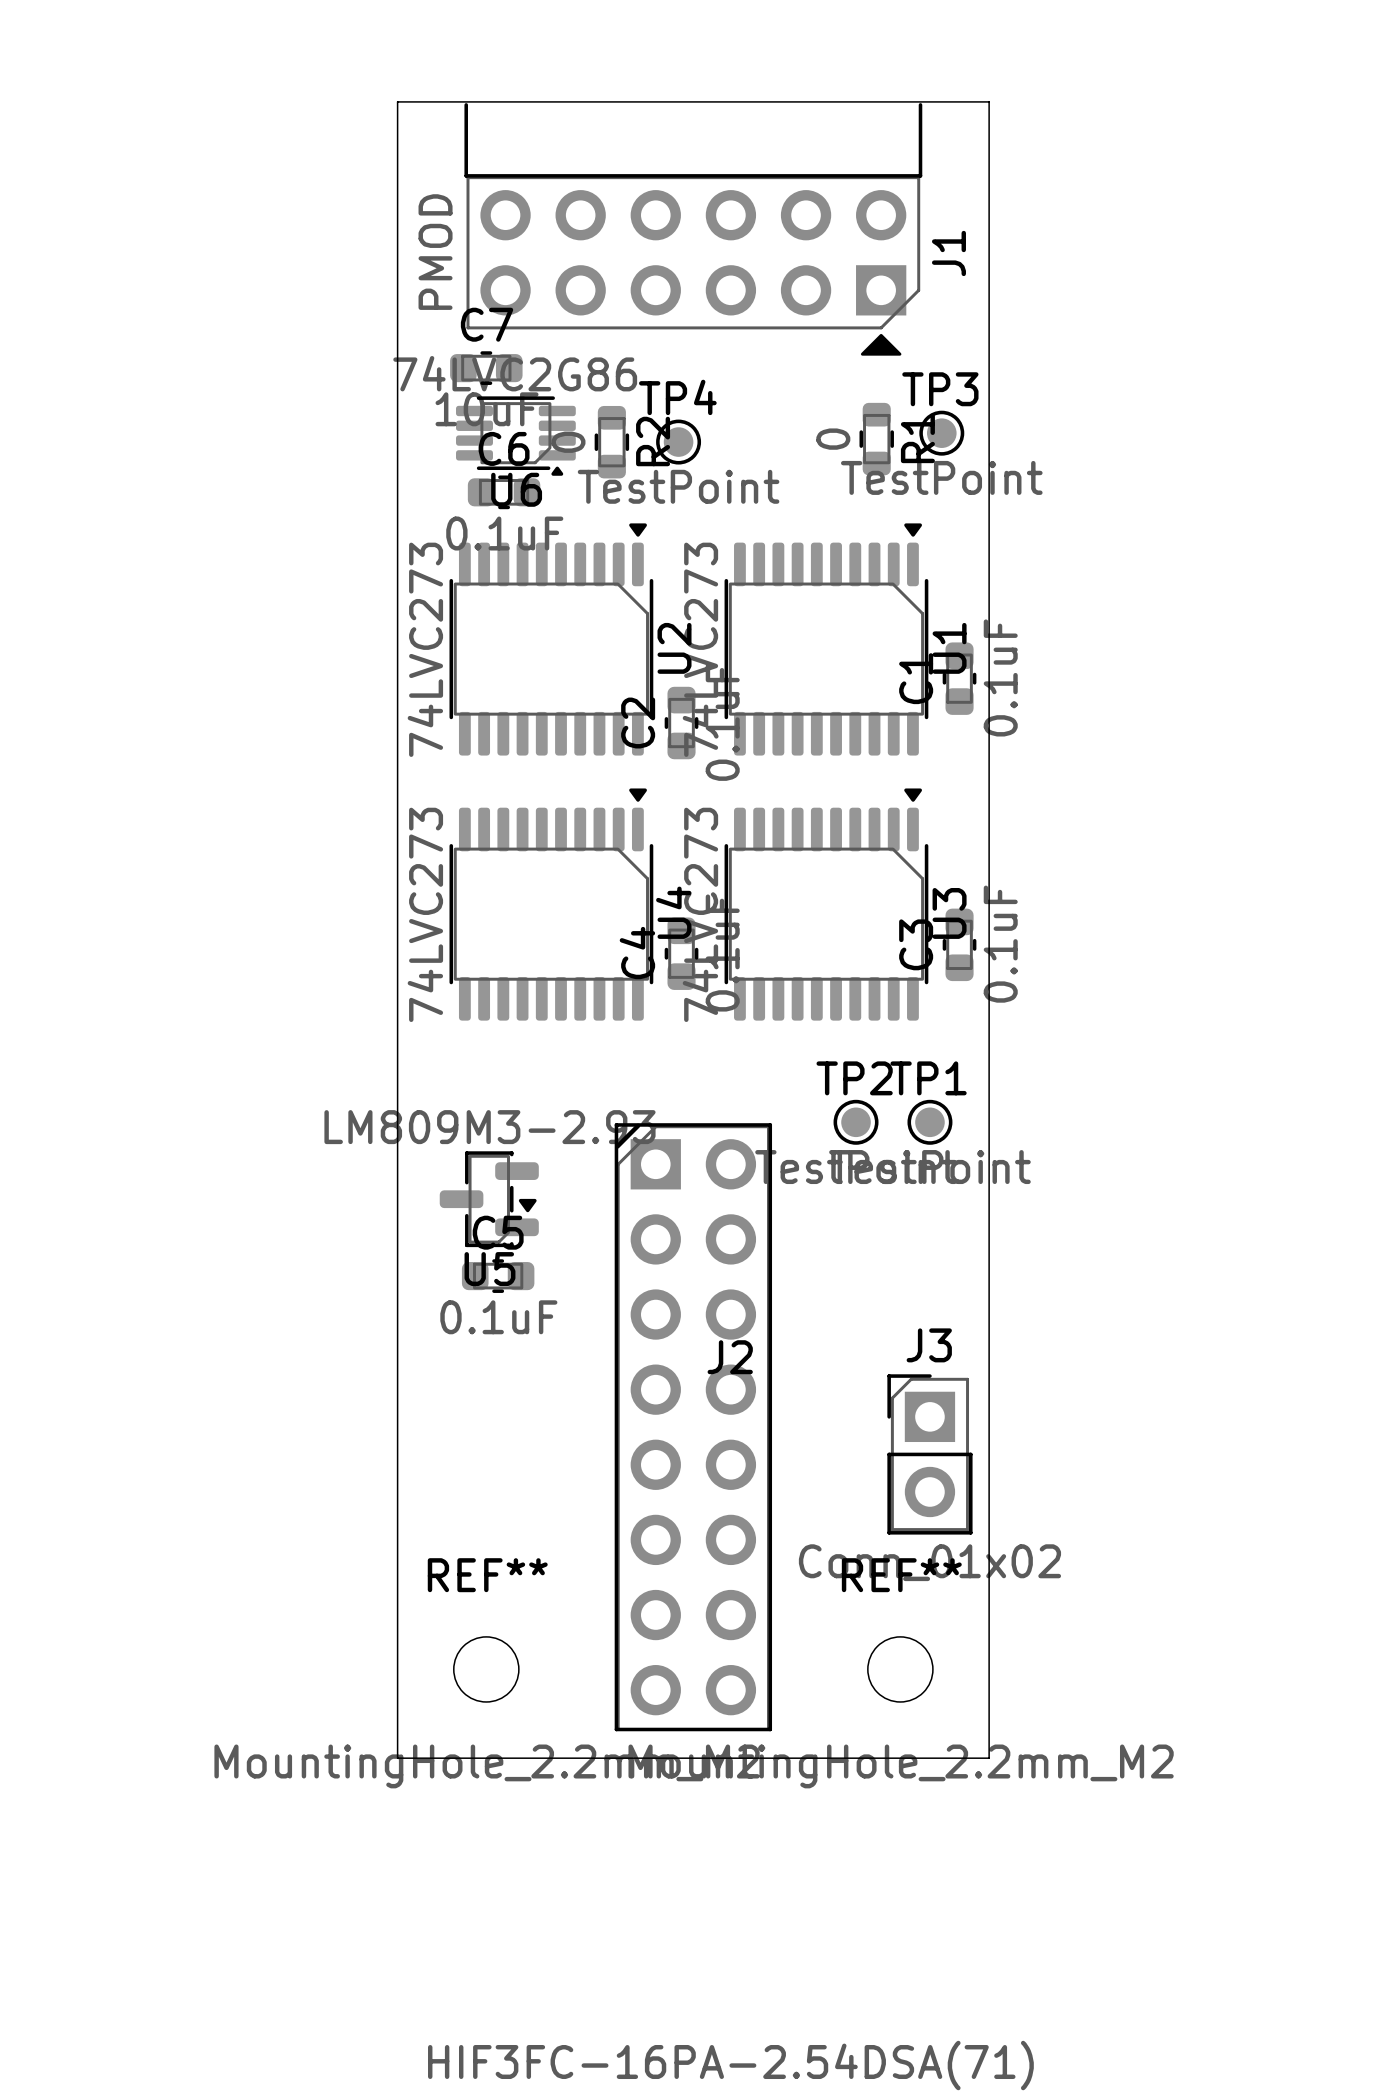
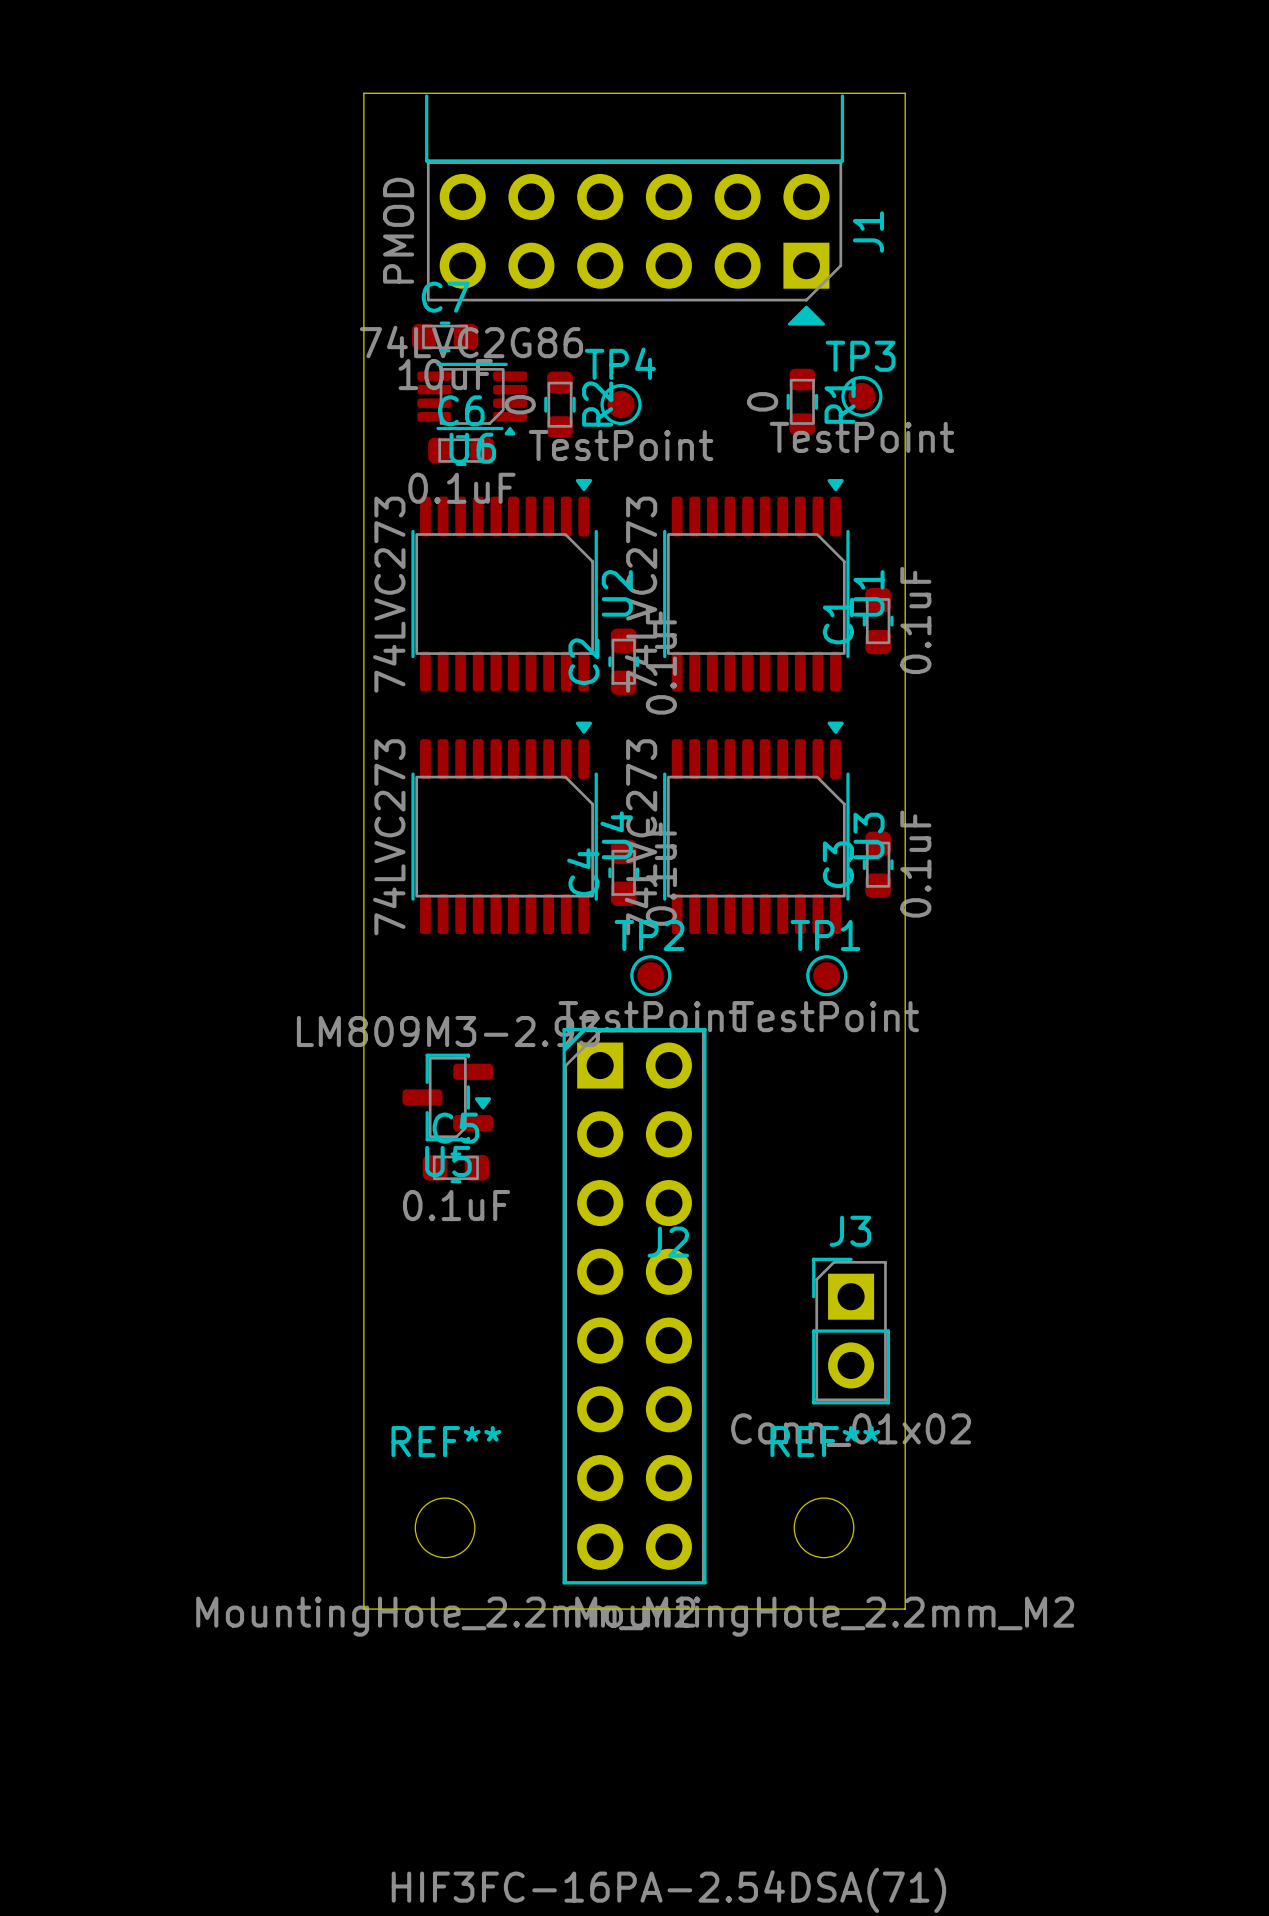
TP2 position: (856, 1122) -> (650, 975)
TP1 position: (929, 1122) -> (826, 975)

